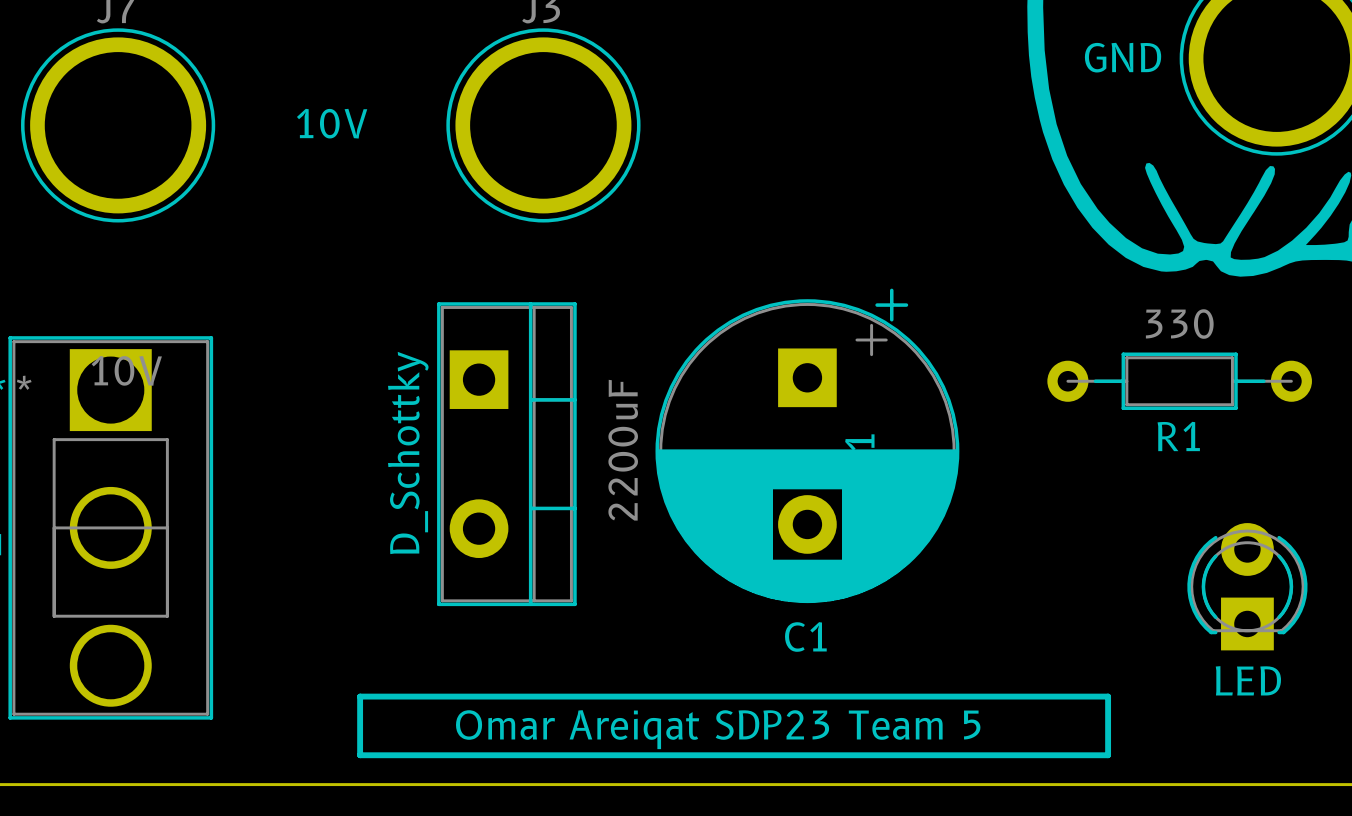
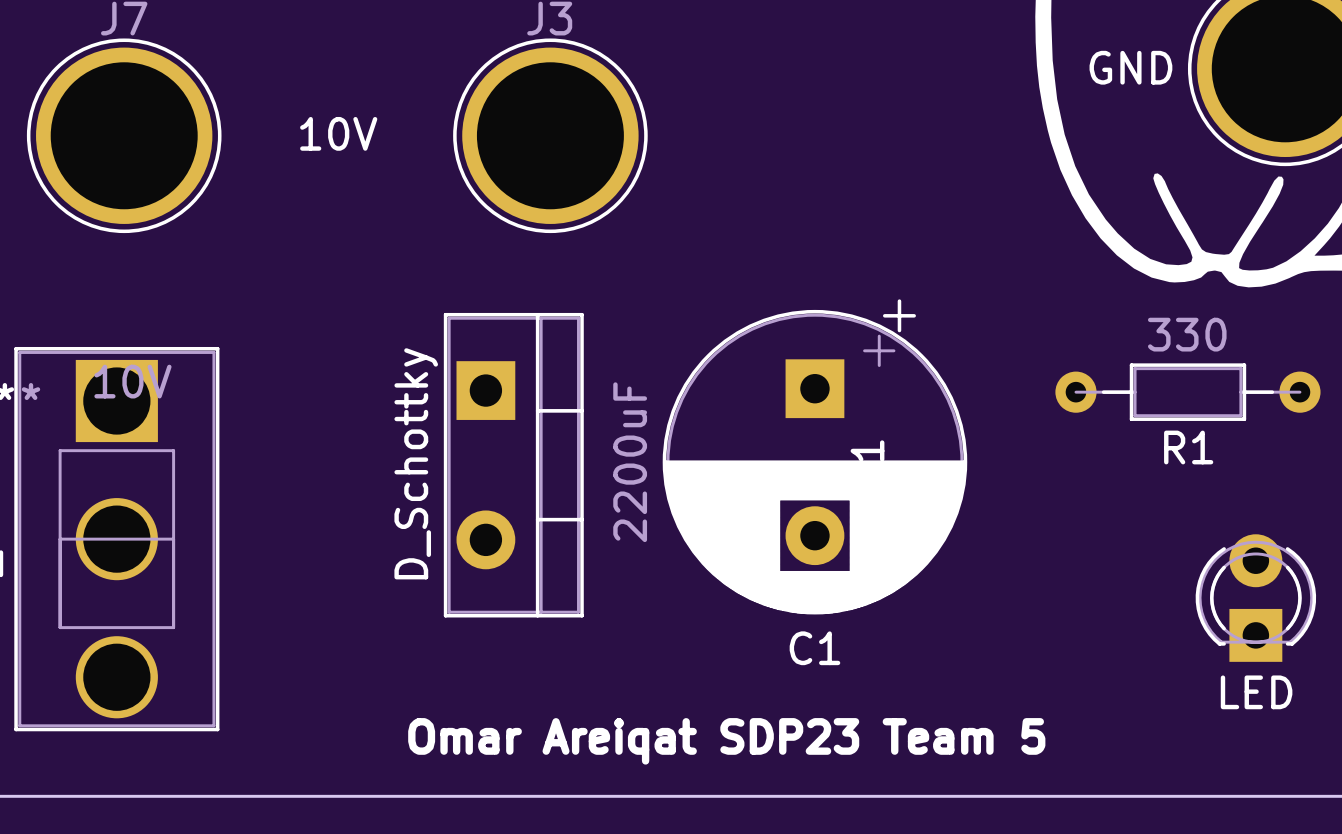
line: (360, 696) (360, 755) (1108, 755) (1108, 696) (360, 696) -> none

